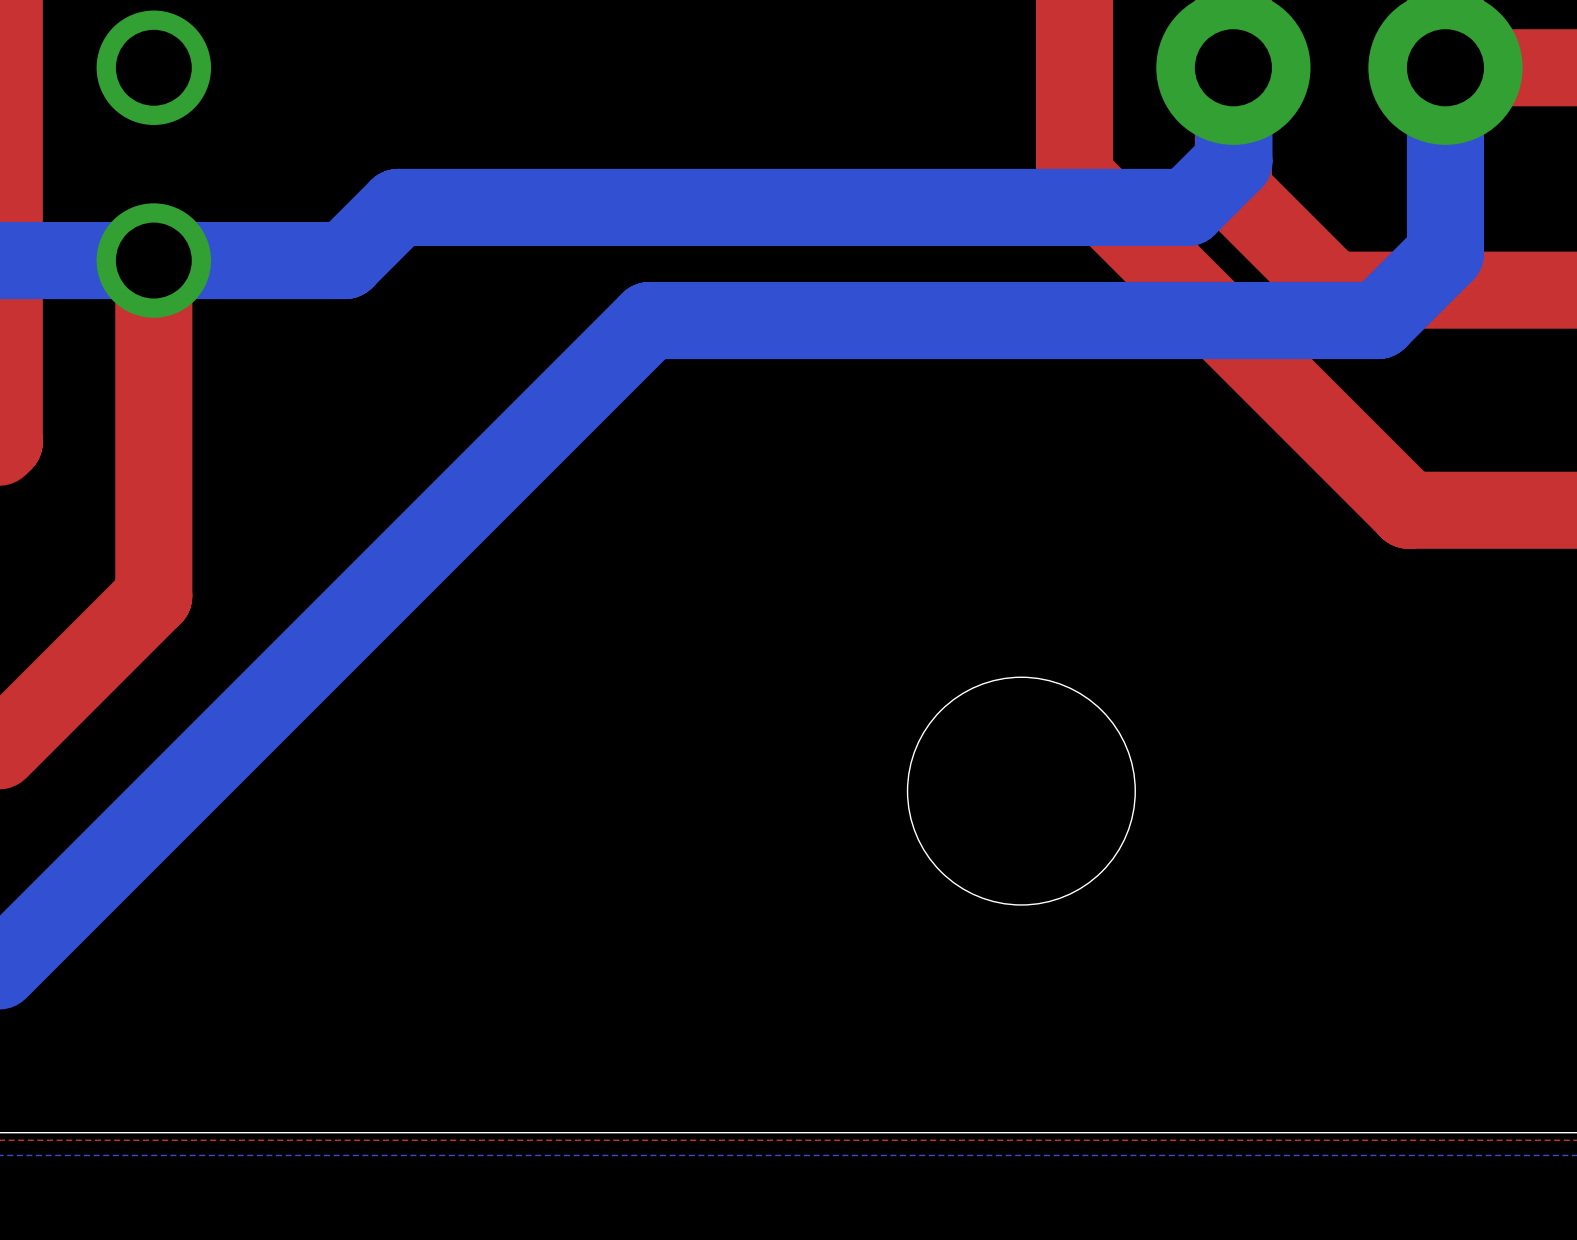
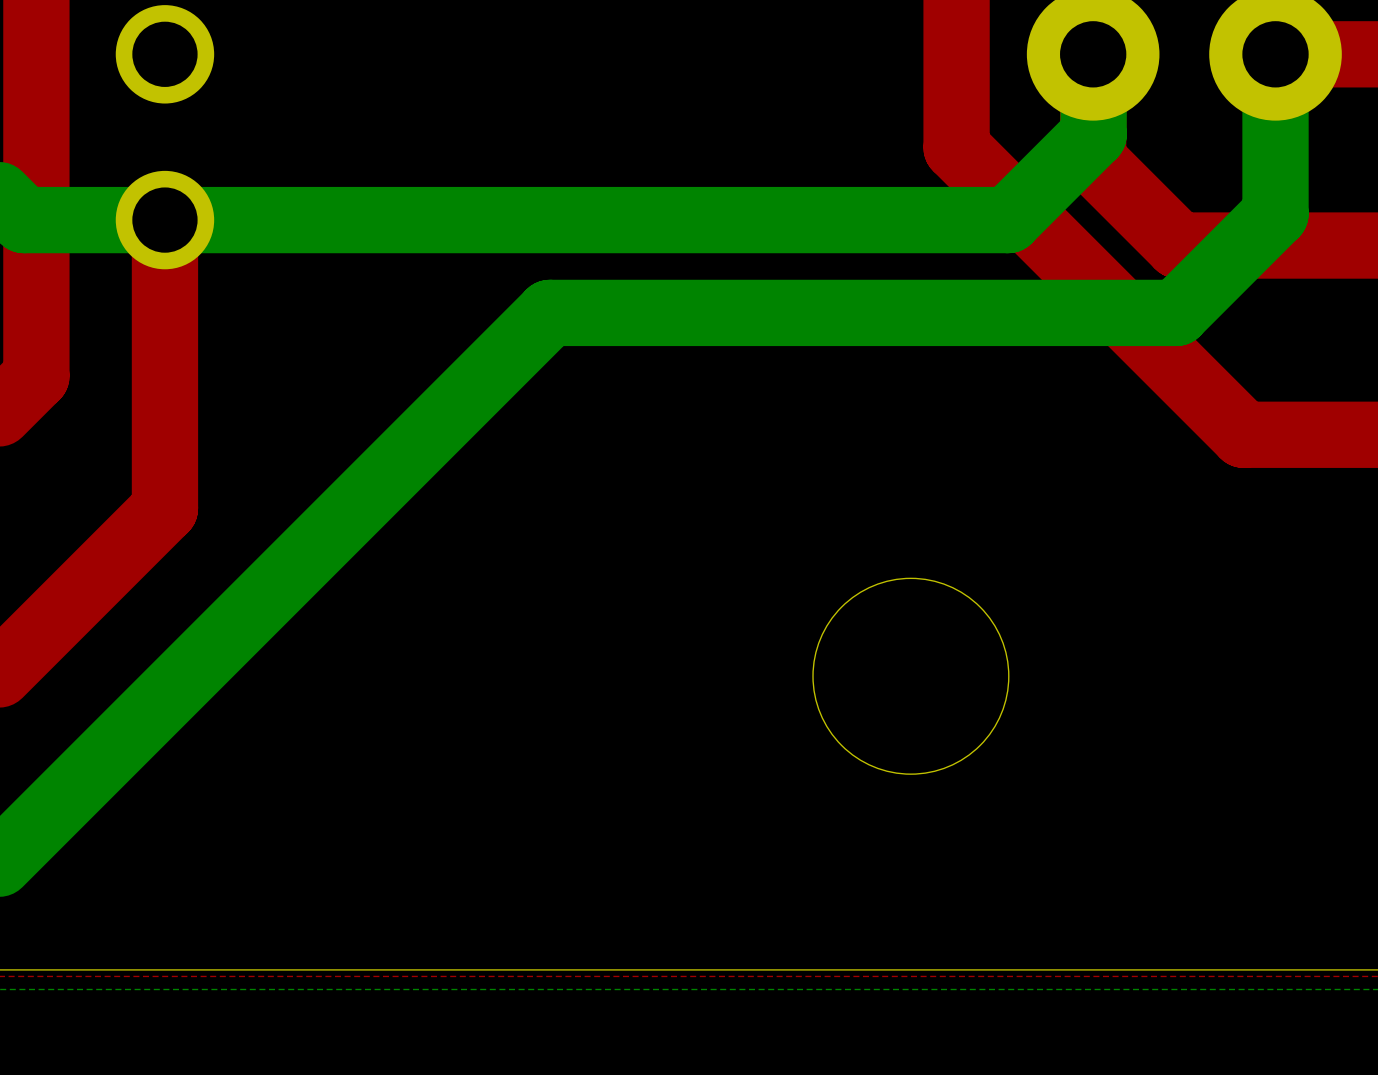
bottom track: (1187, 207) (398, 207) (345, 260) -> (1053, 174) (1008, 220) (329, 220)
bottom track: (1378, 320) (649, 320) (601, 368) -> (1217, 271) (1176, 312) (549, 312)

